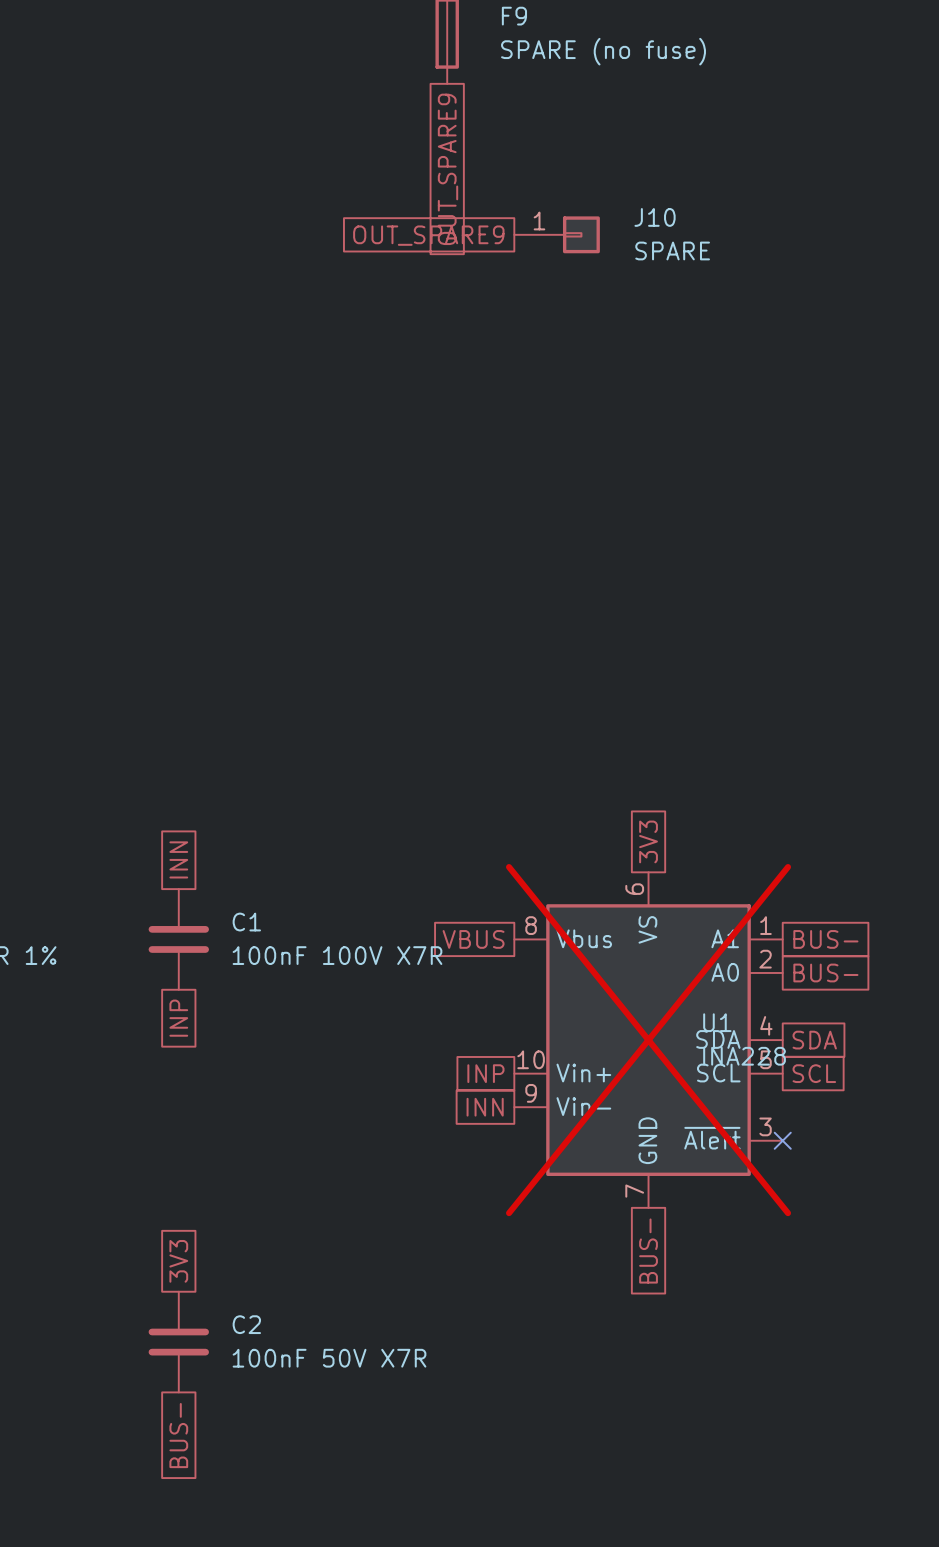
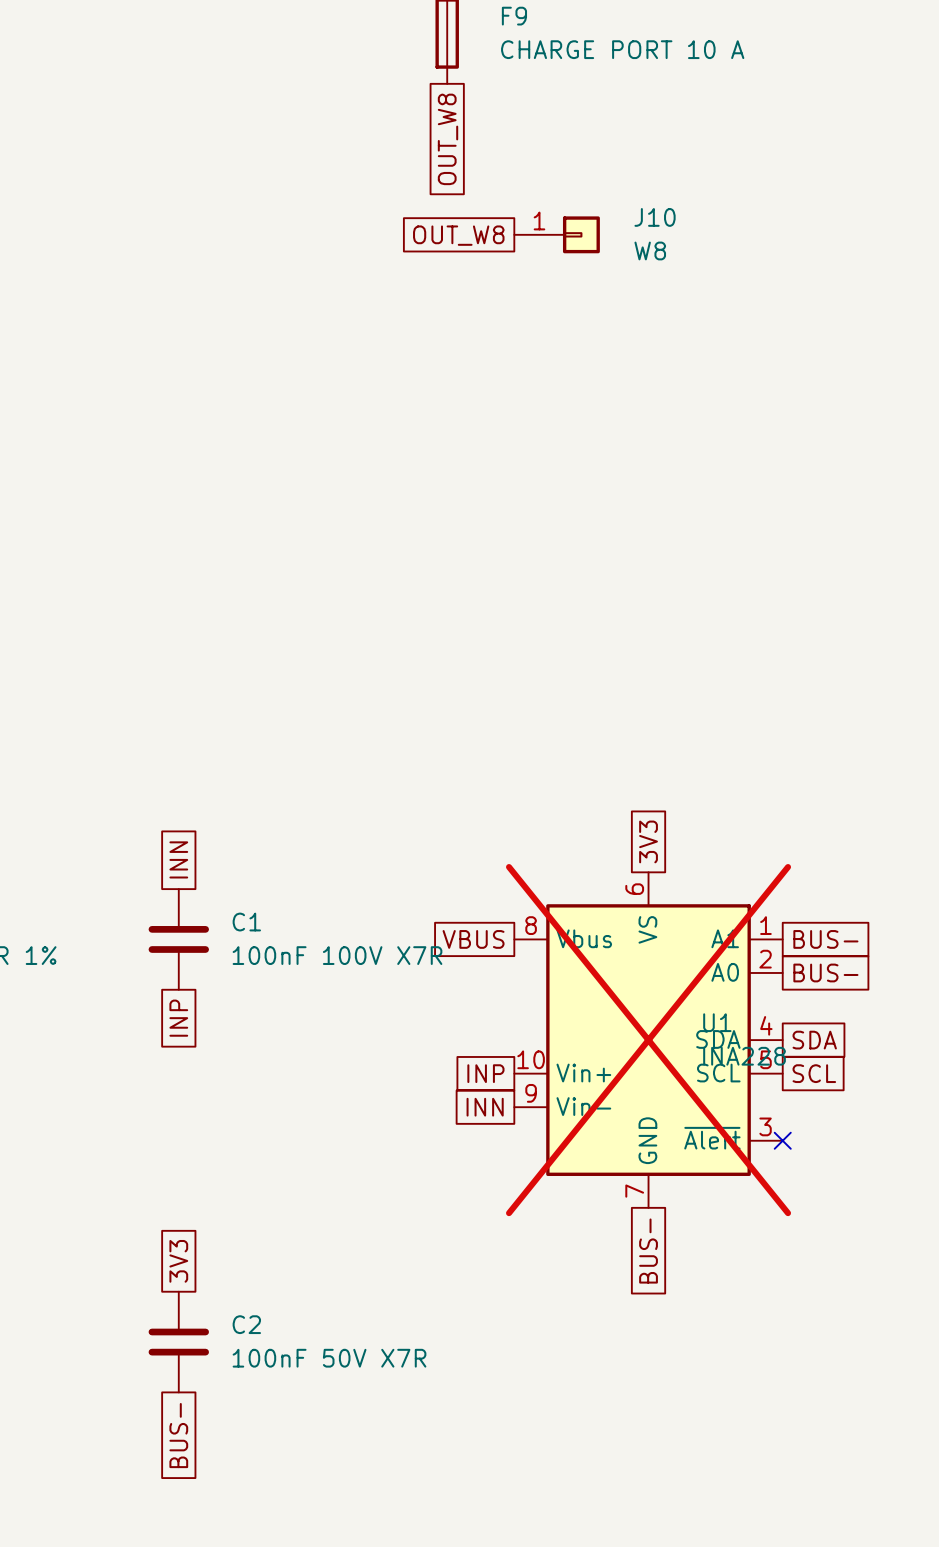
F9 value: SPARE (no fuse) (603, 51) -> CHARGE PORT 10 A (622, 49)
global label: OUT_SPARE9 (448, 169) -> OUT_W8 (448, 139)
global label: OUT_SPARE9 (428, 235) -> OUT_W8 (458, 235)
J10 value: SPARE (672, 250) -> W8 (650, 250)

